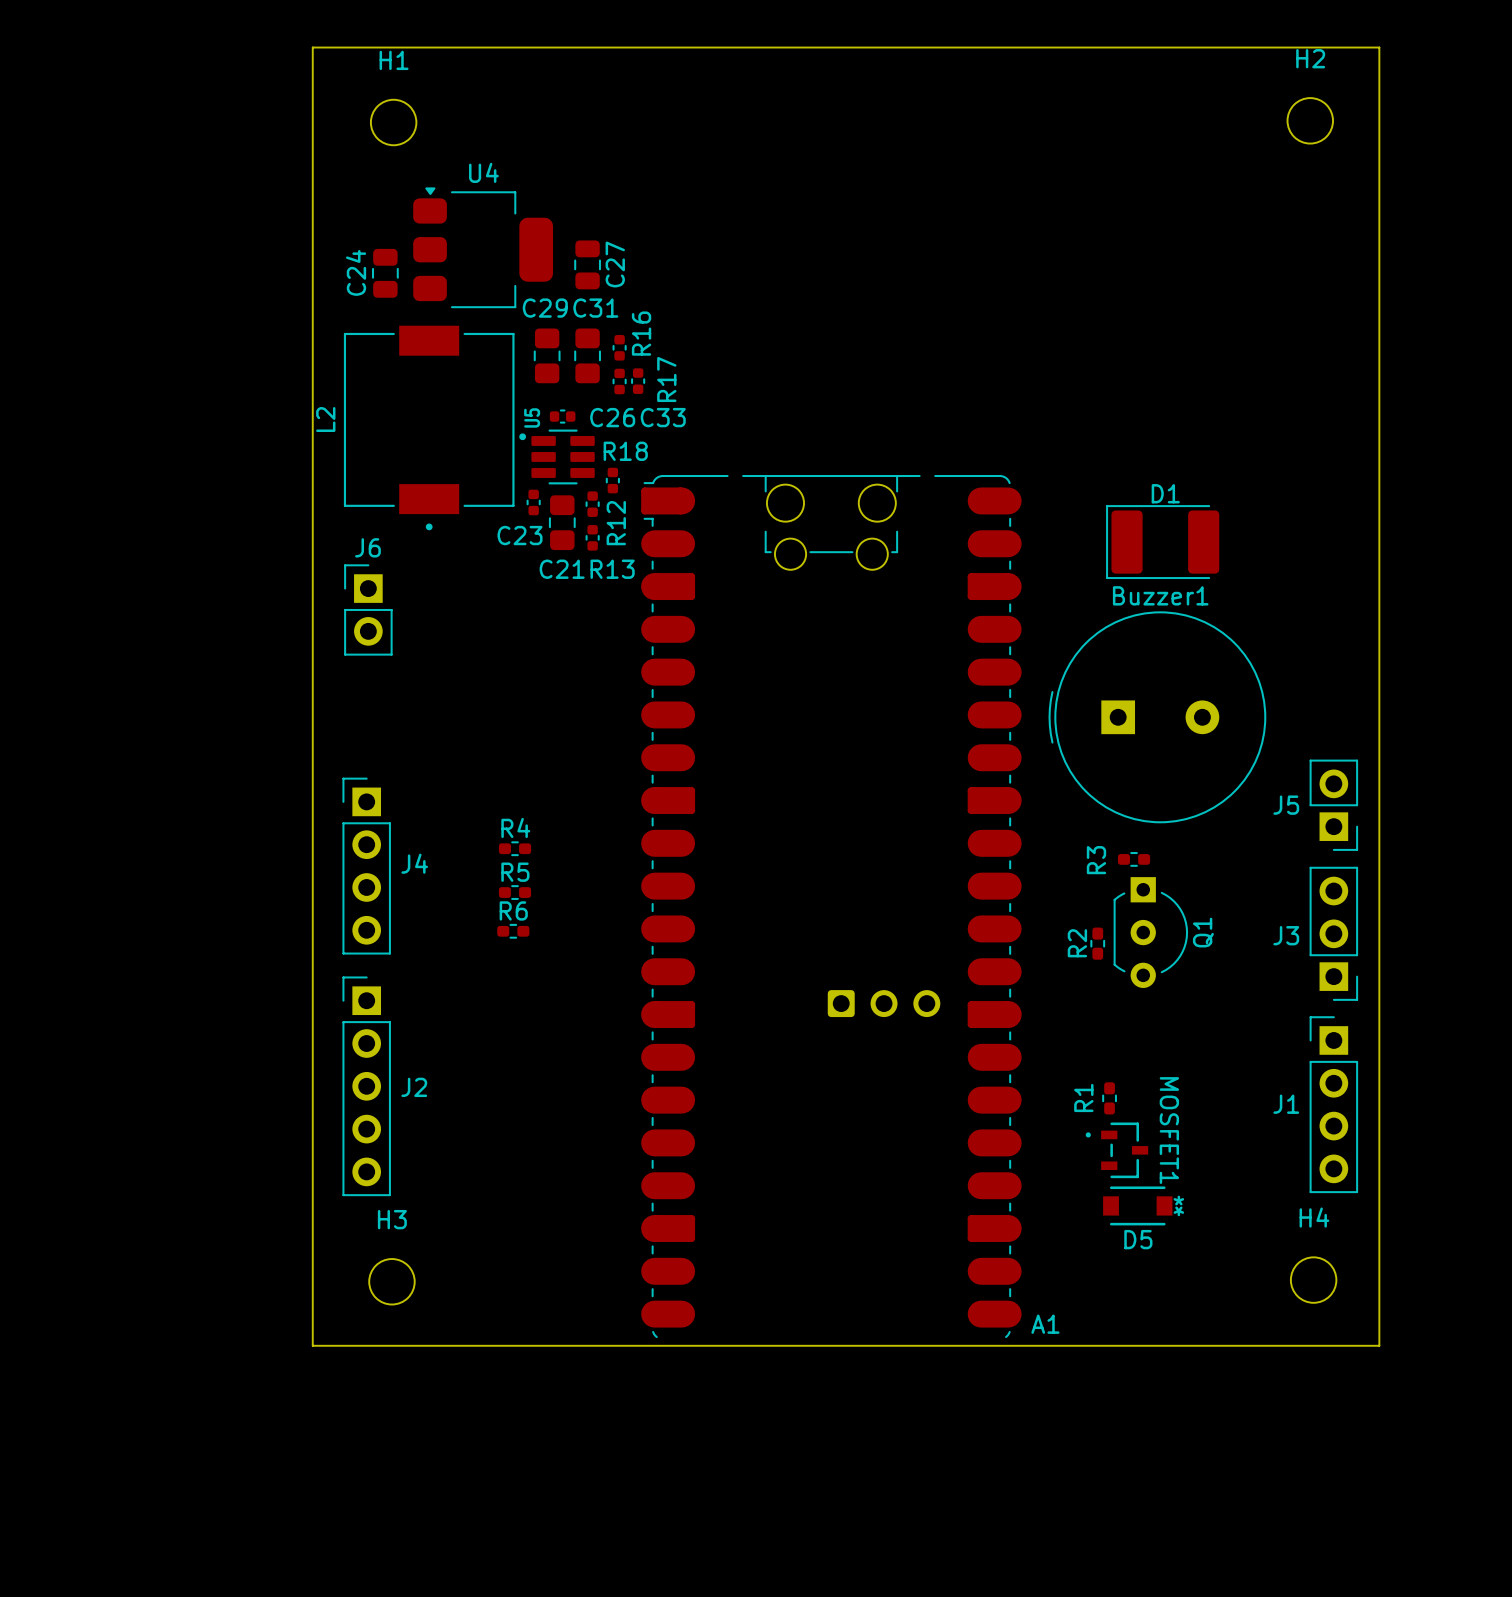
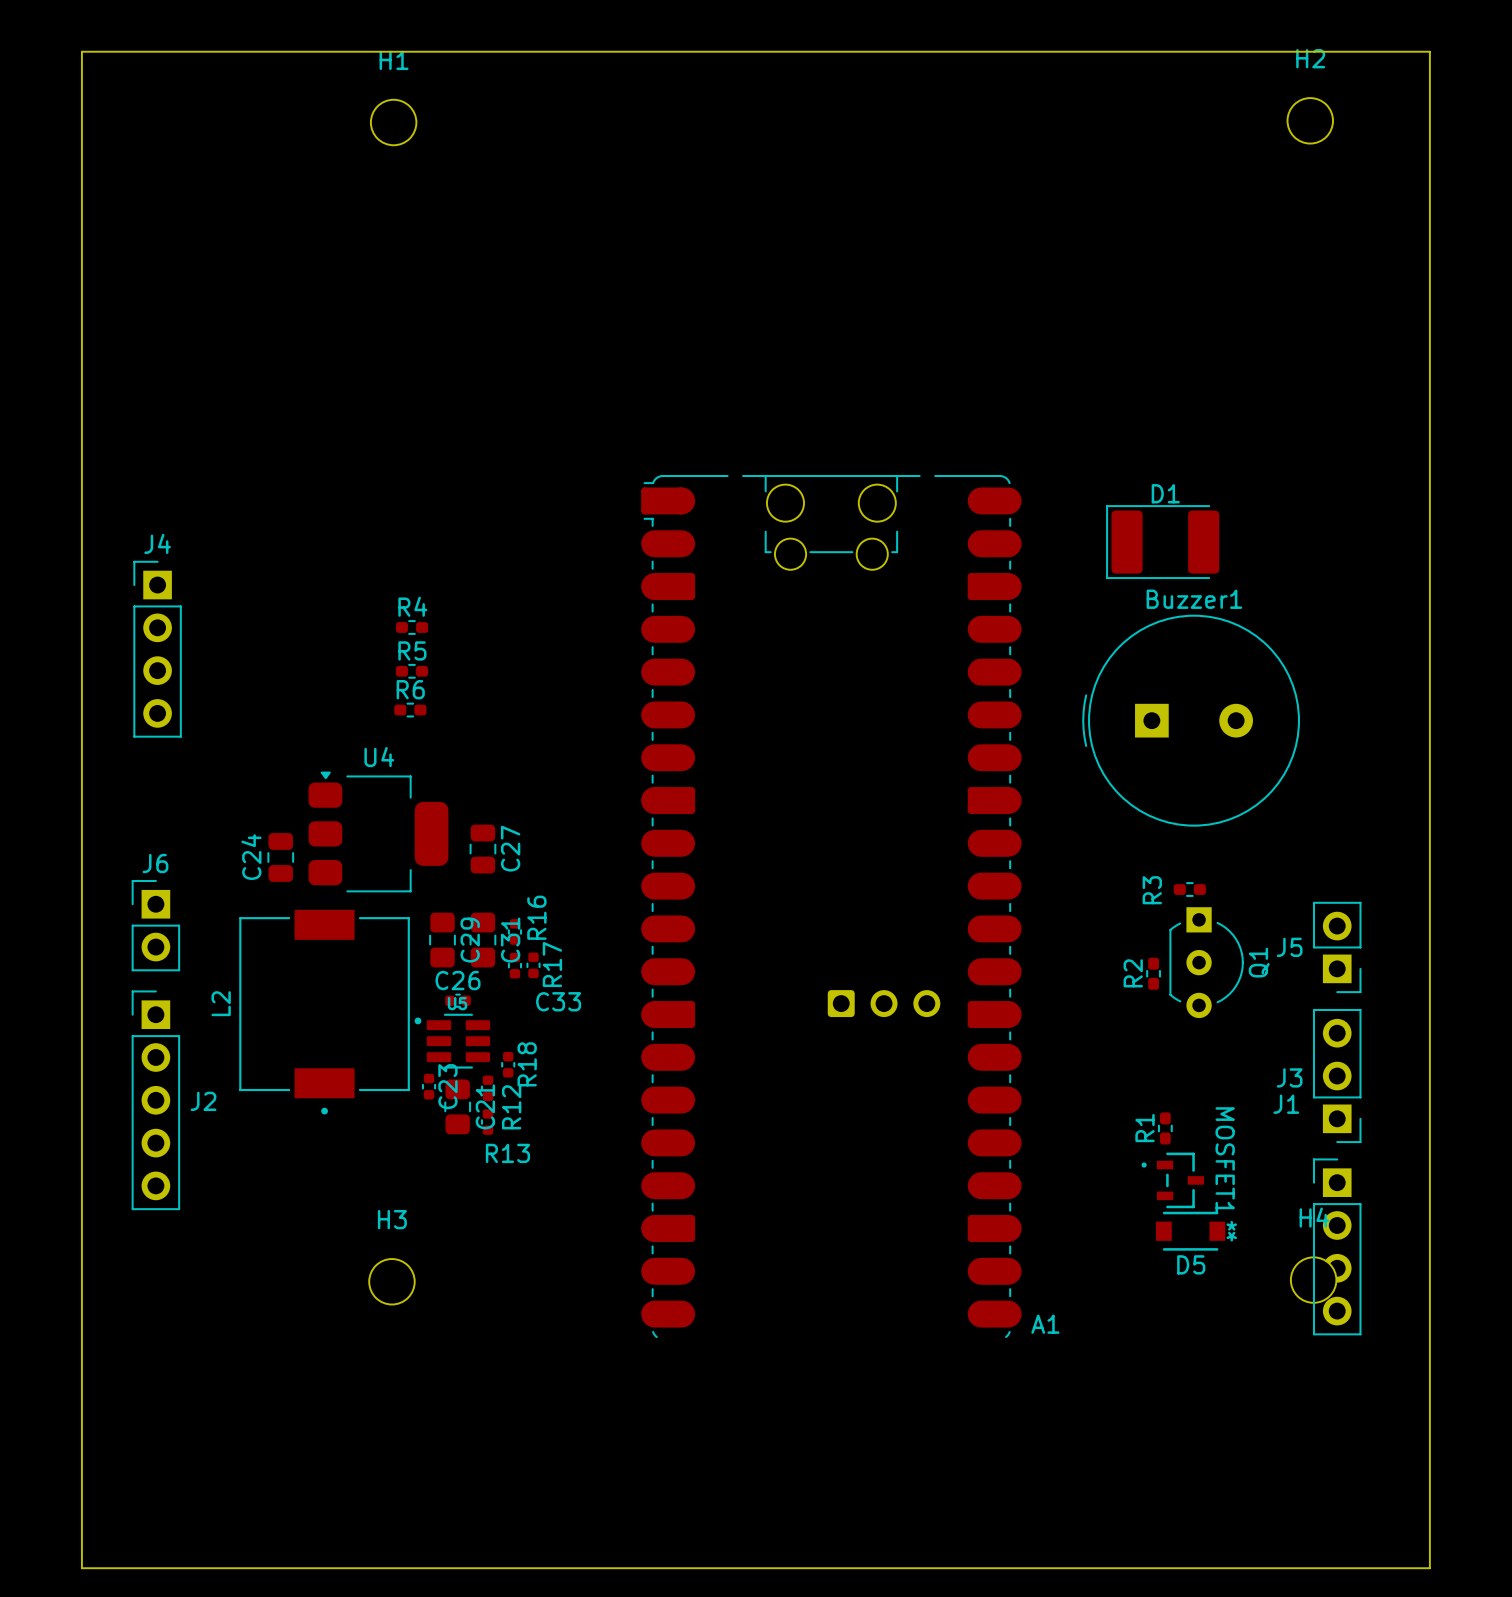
board edge: (312, 47) (1379, 47) (1379, 1345) (312, 1345) (312, 47) -> (81, 51) (81, 1568) (1429, 1568) (1429, 51) (81, 51)
U4 position: (483, 247) -> (378, 831)
C27 position: (587, 264) -> (482, 849)
C24 position: (385, 273) -> (280, 857)
C29 name rotation: 0° (545, 308) -> 90° counterclockwise (470, 940)
C31 name rotation: 0° (595, 308) -> 90° counterclockwise (510, 940)
R16 position: (619, 347) -> (514, 931)
C29 position: (547, 355) -> (442, 940)
C31 position: (587, 355) -> (482, 940)
R17 name position: R17 (666, 379) -> R17 (552, 964)
C33 position: (619, 381) -> (514, 965)
R17 position: (638, 381) -> (533, 965)
C26 position: (562, 416) -> (458, 1000)
U5 name rotation: 0° (532, 417) -> 90° clockwise (457, 1003)
U5 name position: U5 (532, 417) -> U5 (457, 1003)
C26 name position: C26 (612, 417) -> C26 (458, 980)
L2 position: (429, 427) -> (324, 1012)
R18 name rotation: 0° (625, 451) -> 90° counterclockwise (527, 1064)
U5 position: (557, 456) -> (452, 1041)
R18 position: (612, 480) -> (508, 1064)
C23 position: (533, 502) -> (429, 1086)
R12 position: (592, 504) -> (488, 1088)
C21 position: (562, 522) -> (457, 1106)
C23 name rotation: 0° (520, 535) -> 90° counterclockwise (447, 1086)
R13 position: (592, 537) -> (488, 1122)
C21 name rotation: 0° (562, 569) -> 90° counterclockwise (485, 1106)
J6 position: (368, 609) -> (155, 925)
Buzzer1 position: (1157, 717) -> (1191, 720)
J5 position: (1333, 805) -> (1337, 947)
R4 position: (515, 848) -> (412, 627)
R3 position: (1134, 859) -> (1189, 889)
J4 name position: J4 (414, 863) -> J4 (157, 543)
J4 position: (366, 866) -> (157, 649)
R5 position: (515, 892) -> (412, 671)
R6 position: (513, 931) -> (410, 710)
Q1 position: (1150, 932) -> (1206, 962)
J1 position: (1333, 933) -> (1337, 1076)
R2 position: (1097, 943) -> (1153, 973)
J2 position: (366, 1086) -> (155, 1100)
R1 name position: R1 (1083, 1097) -> R1 (1145, 1128)
R1 position: (1109, 1098) -> (1165, 1128)
J3 position: (1333, 1104) -> (1337, 1246)
MOSFET1 position: (1116, 1150) -> (1172, 1180)
D5 position: (1137, 1205) -> (1190, 1231)

